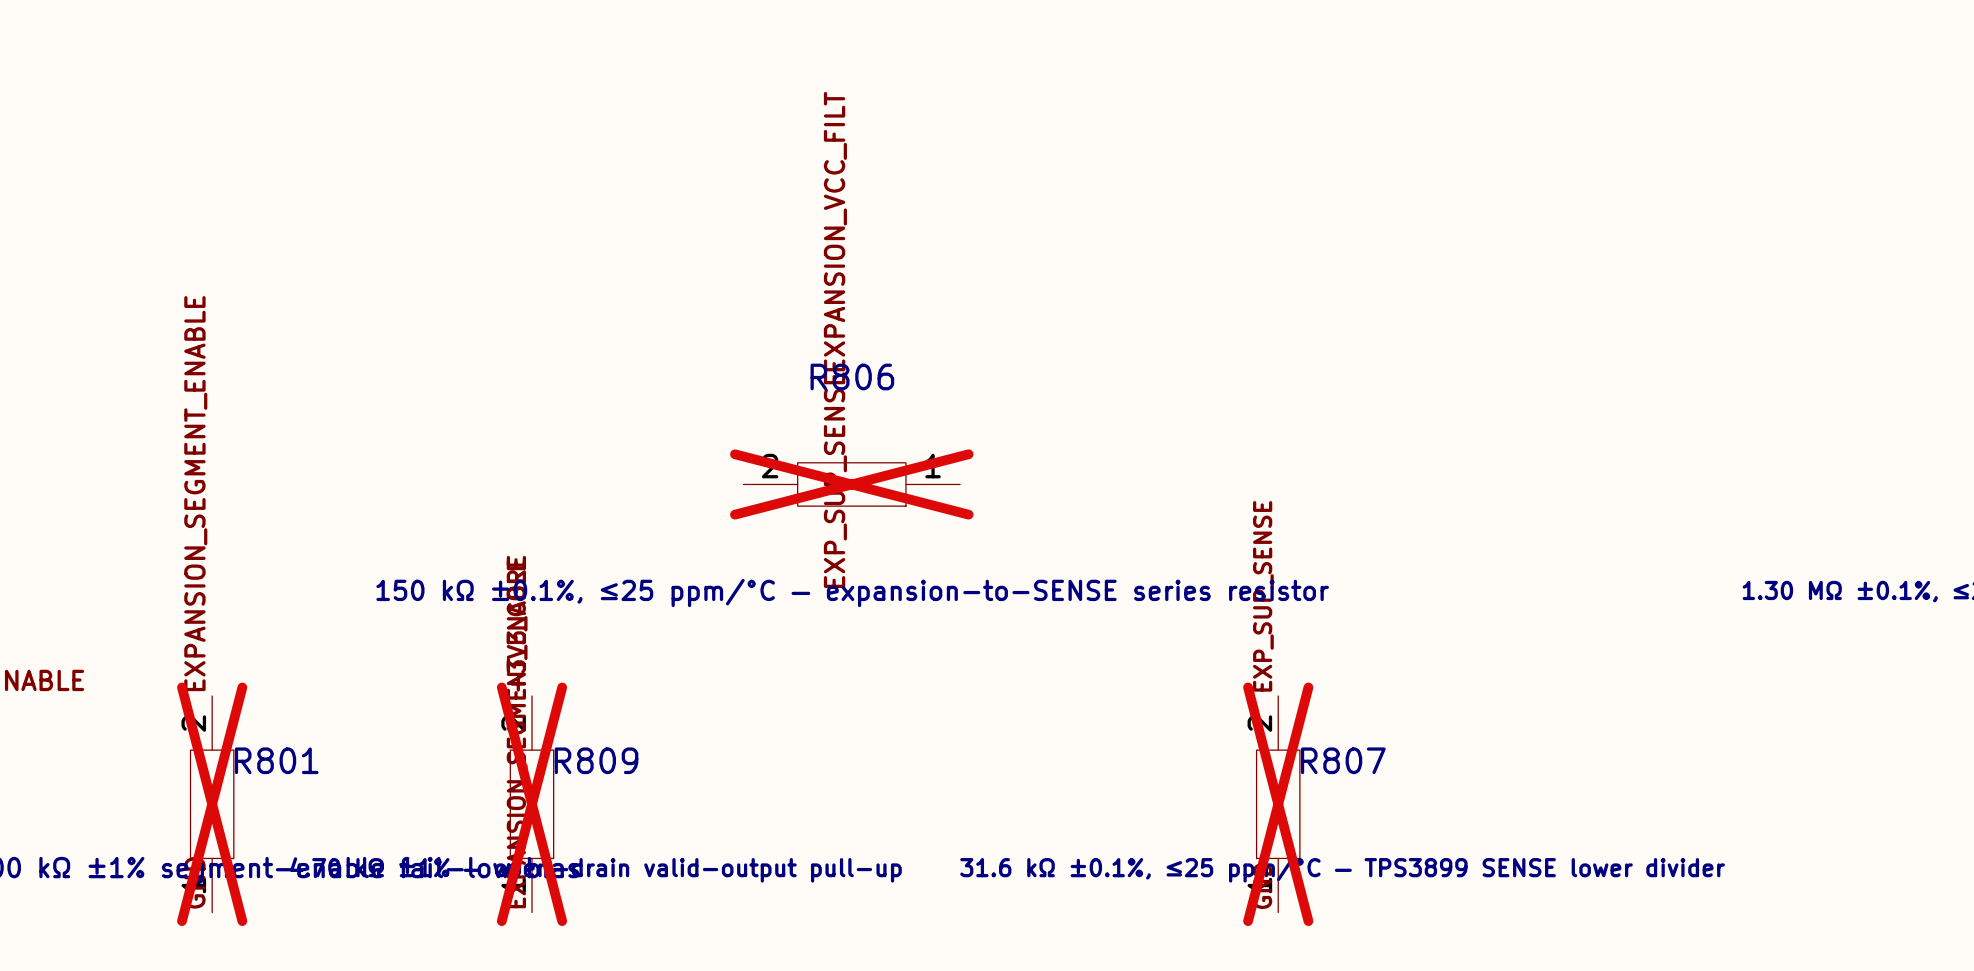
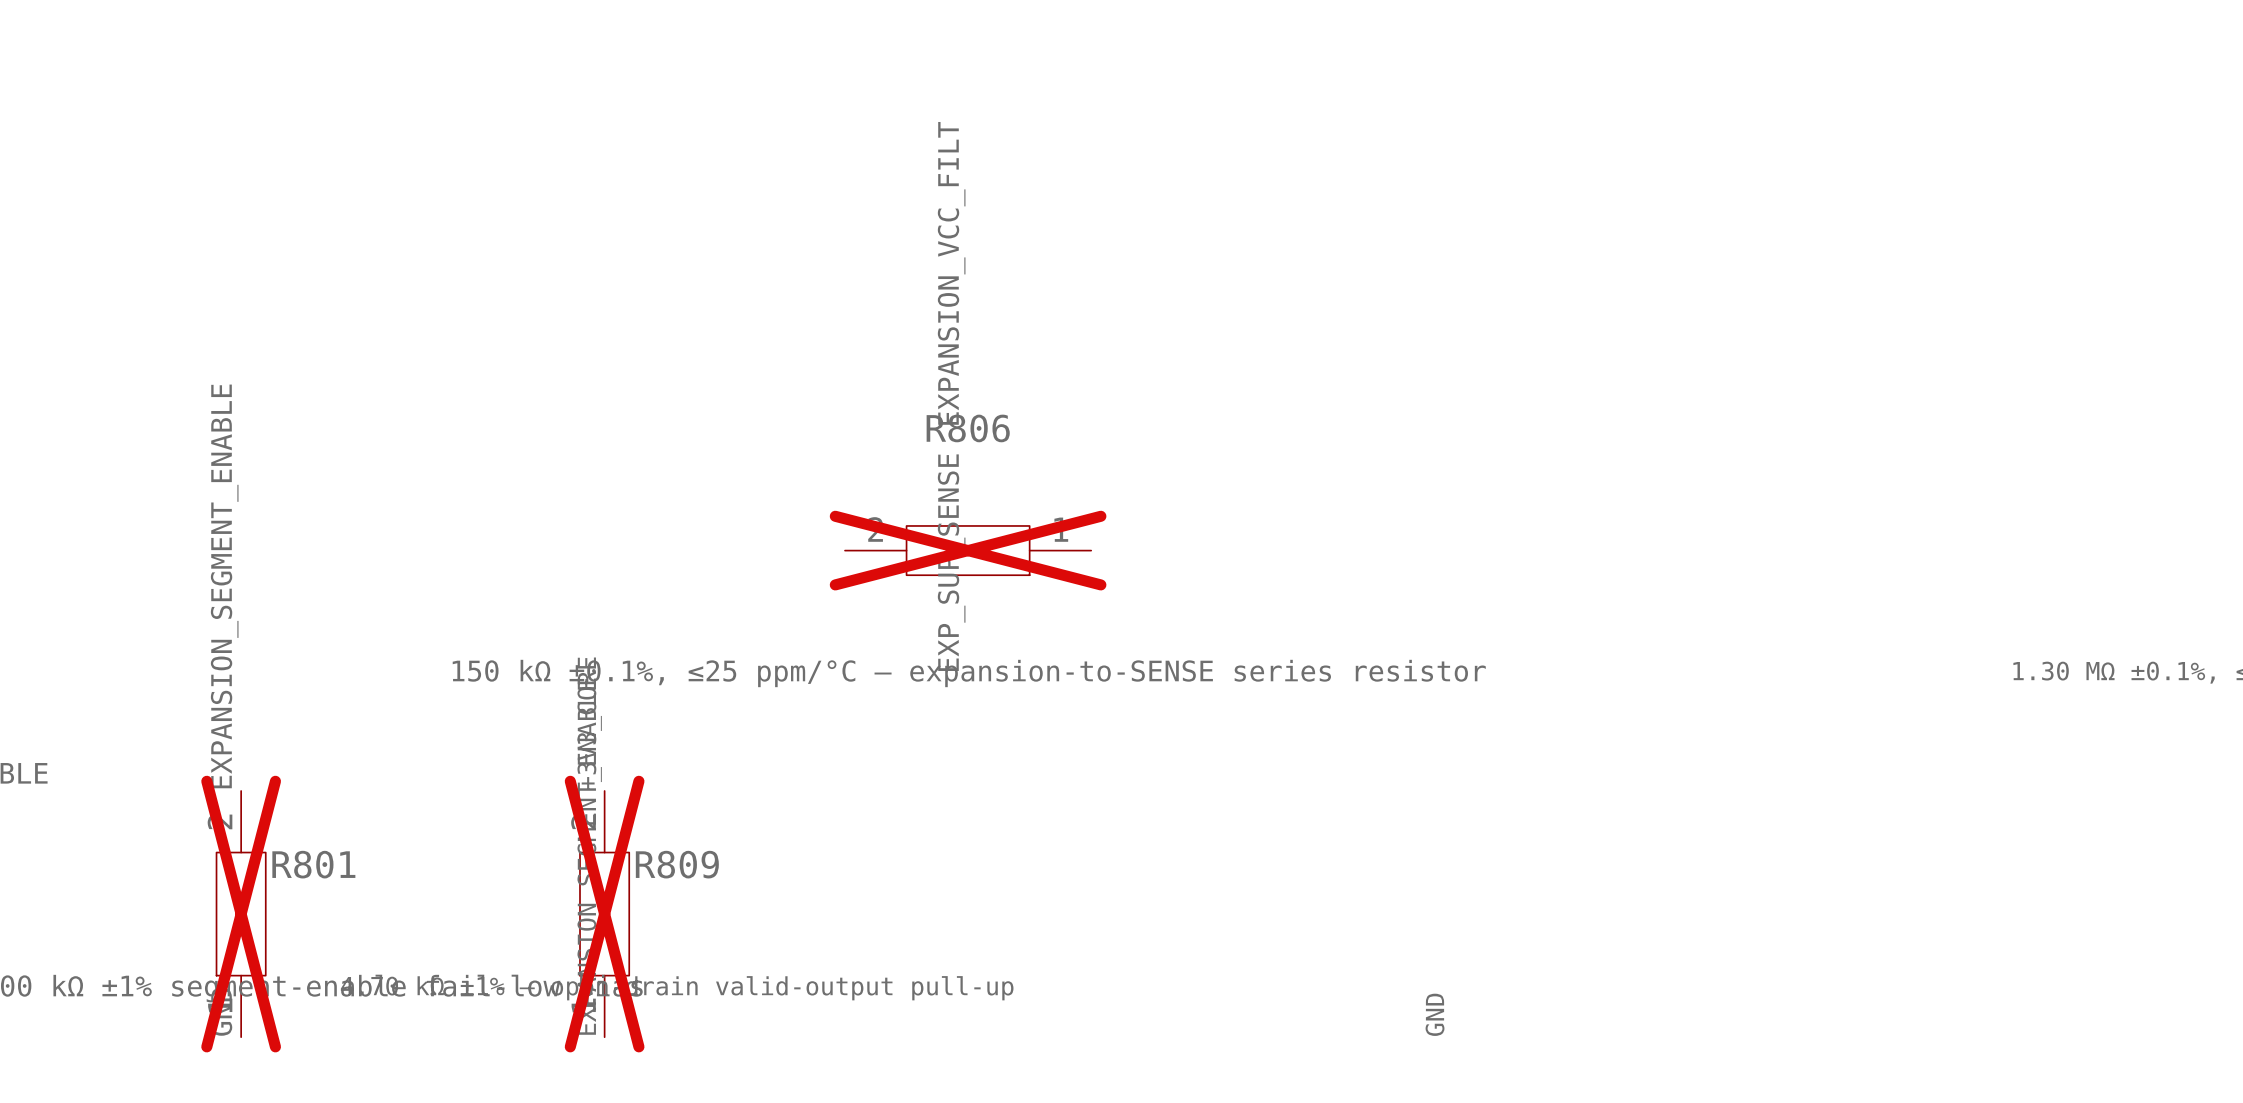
label: EXP_SUP_SENSE (1263, 596) -> none
R807: 31.6 kΩ ±0.1%, ≤25 ppm/°C — TPS3899 SENSE lower divider (1278, 804) -> none

